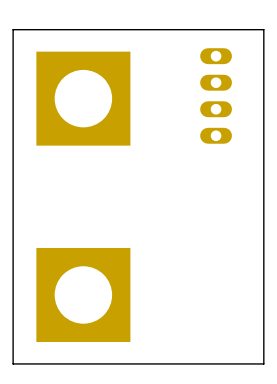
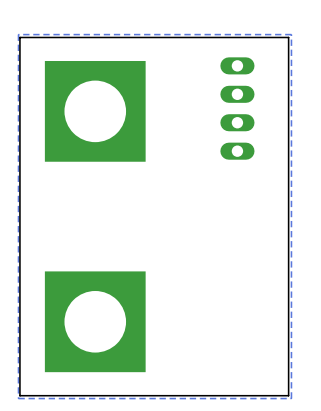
zone outline: none -> (291, 34) (18, 34) (18, 398) (291, 398) (291, 34)

